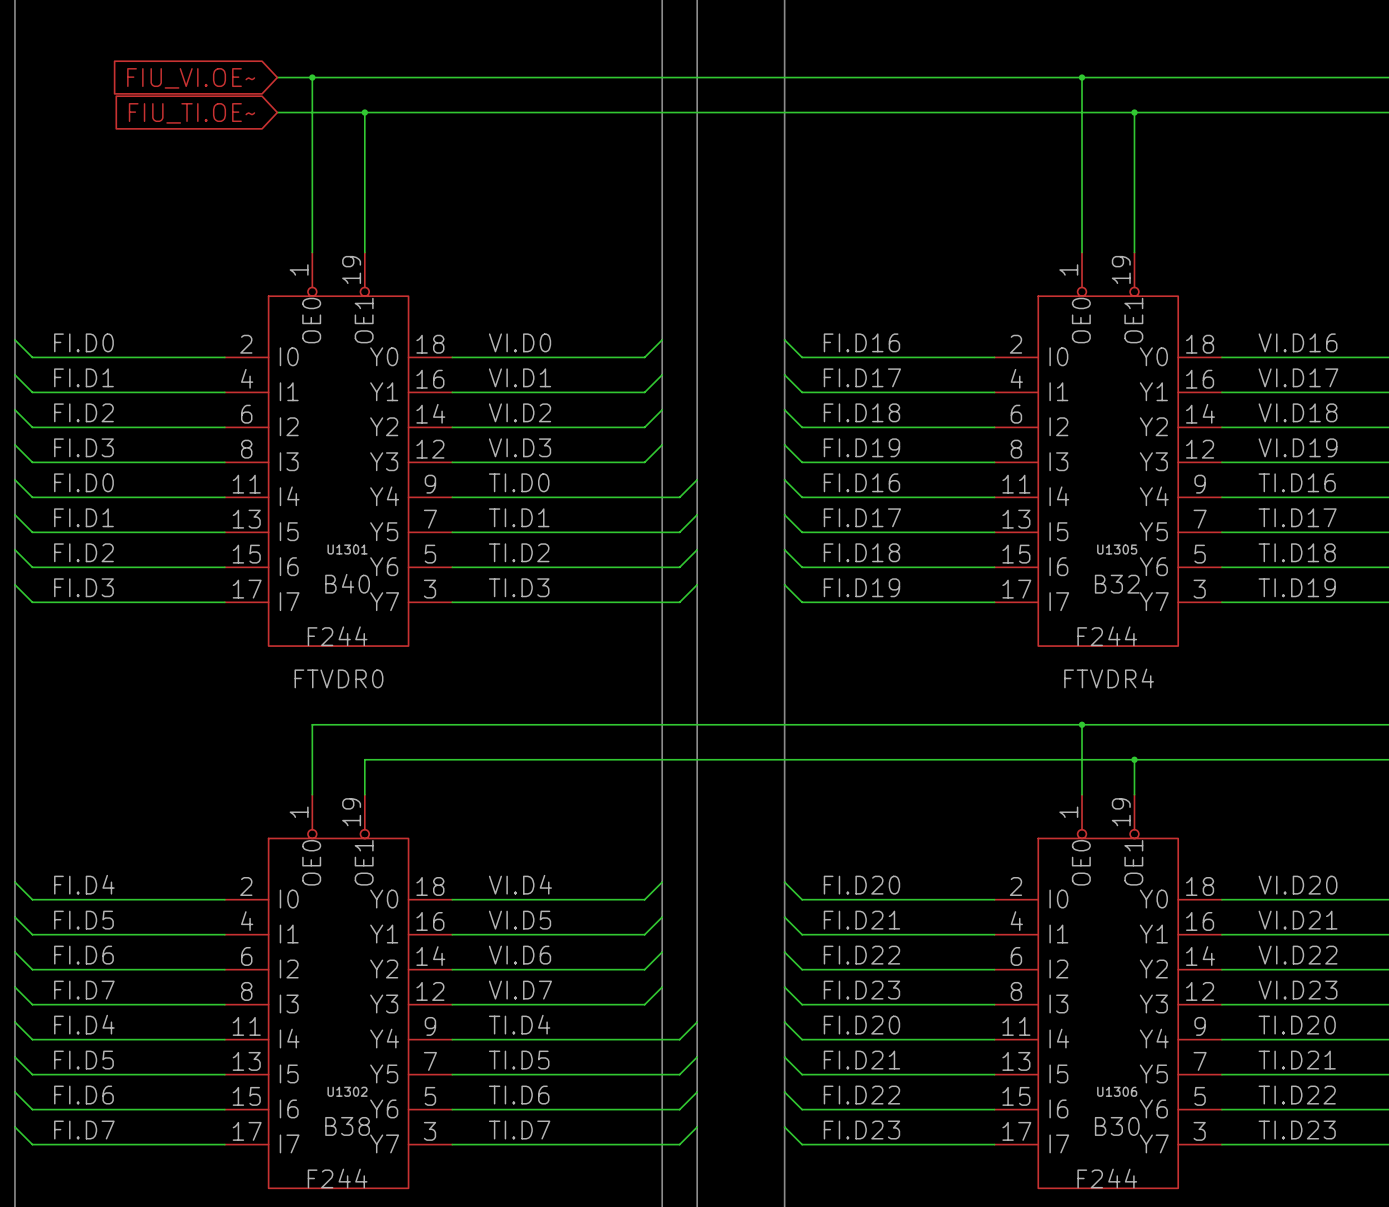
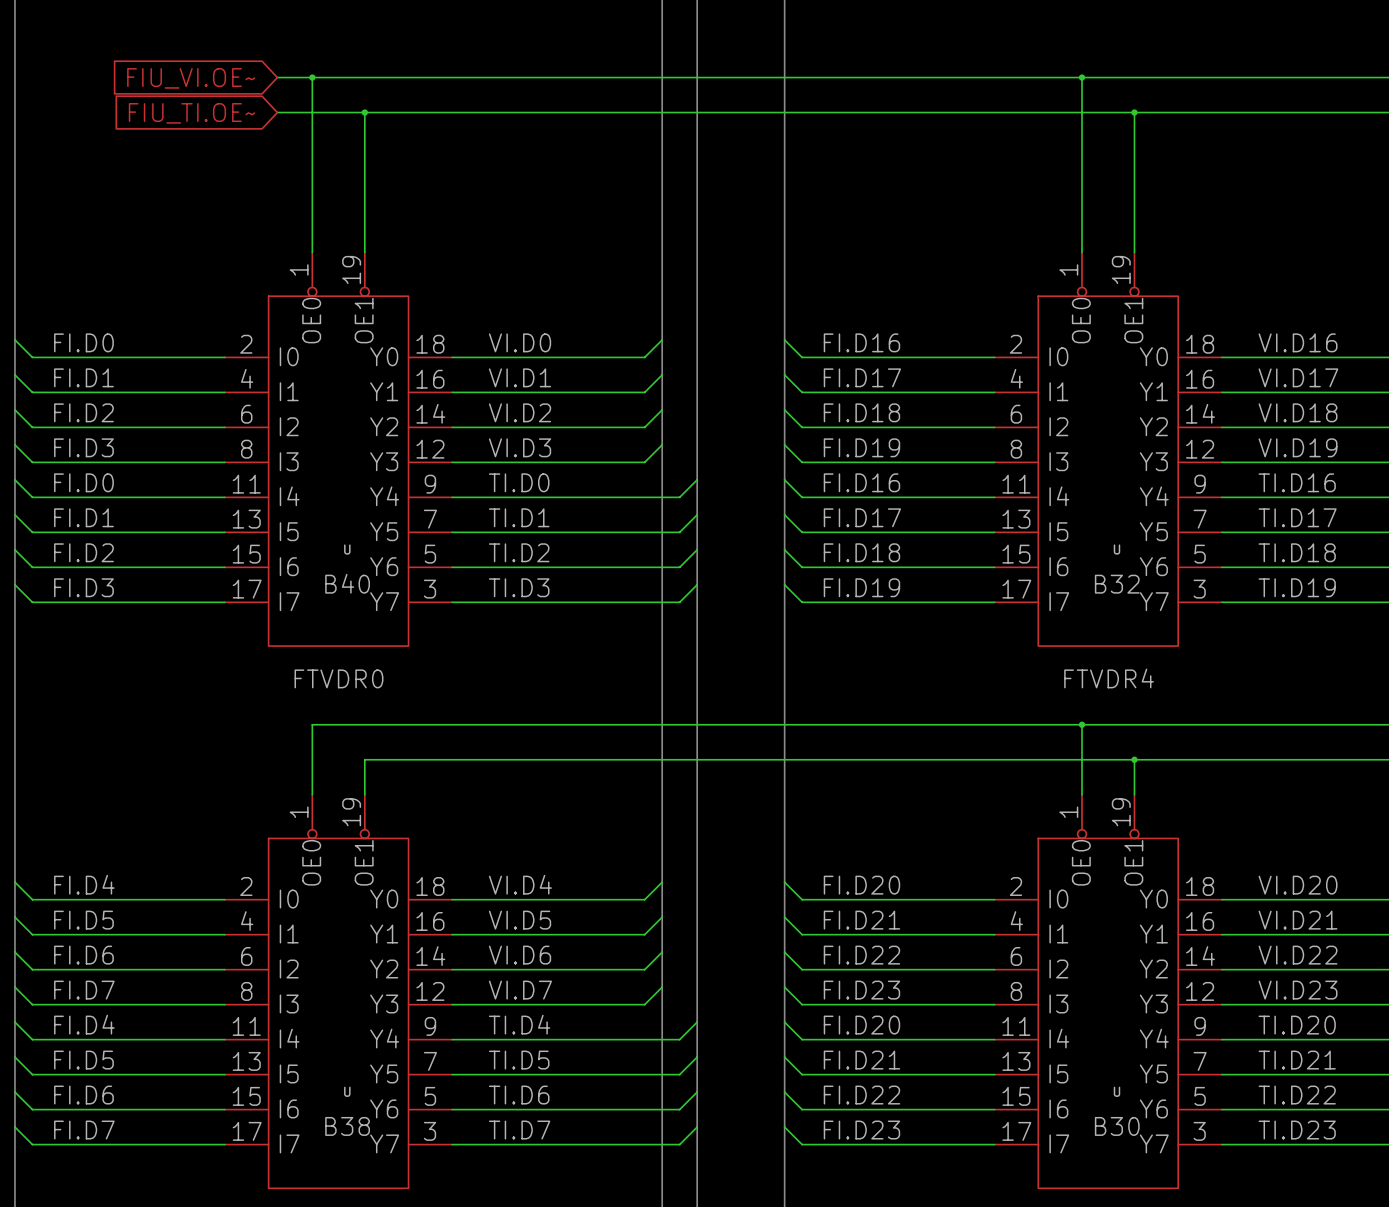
U1301 name: U1301 (347, 549) -> U (347, 549)
U1305 name: U1305 (1117, 549) -> U (1116, 549)
U1301 value: F244 (337, 636) -> none
U1305 value: F244 (1107, 636) -> none
U1302 name: U1302 (347, 1091) -> U (347, 1091)
U1306 name: U1306 (1117, 1091) -> U (1116, 1091)
U1302 value: F244 (337, 1178) -> none
U1306 value: F244 (1107, 1178) -> none

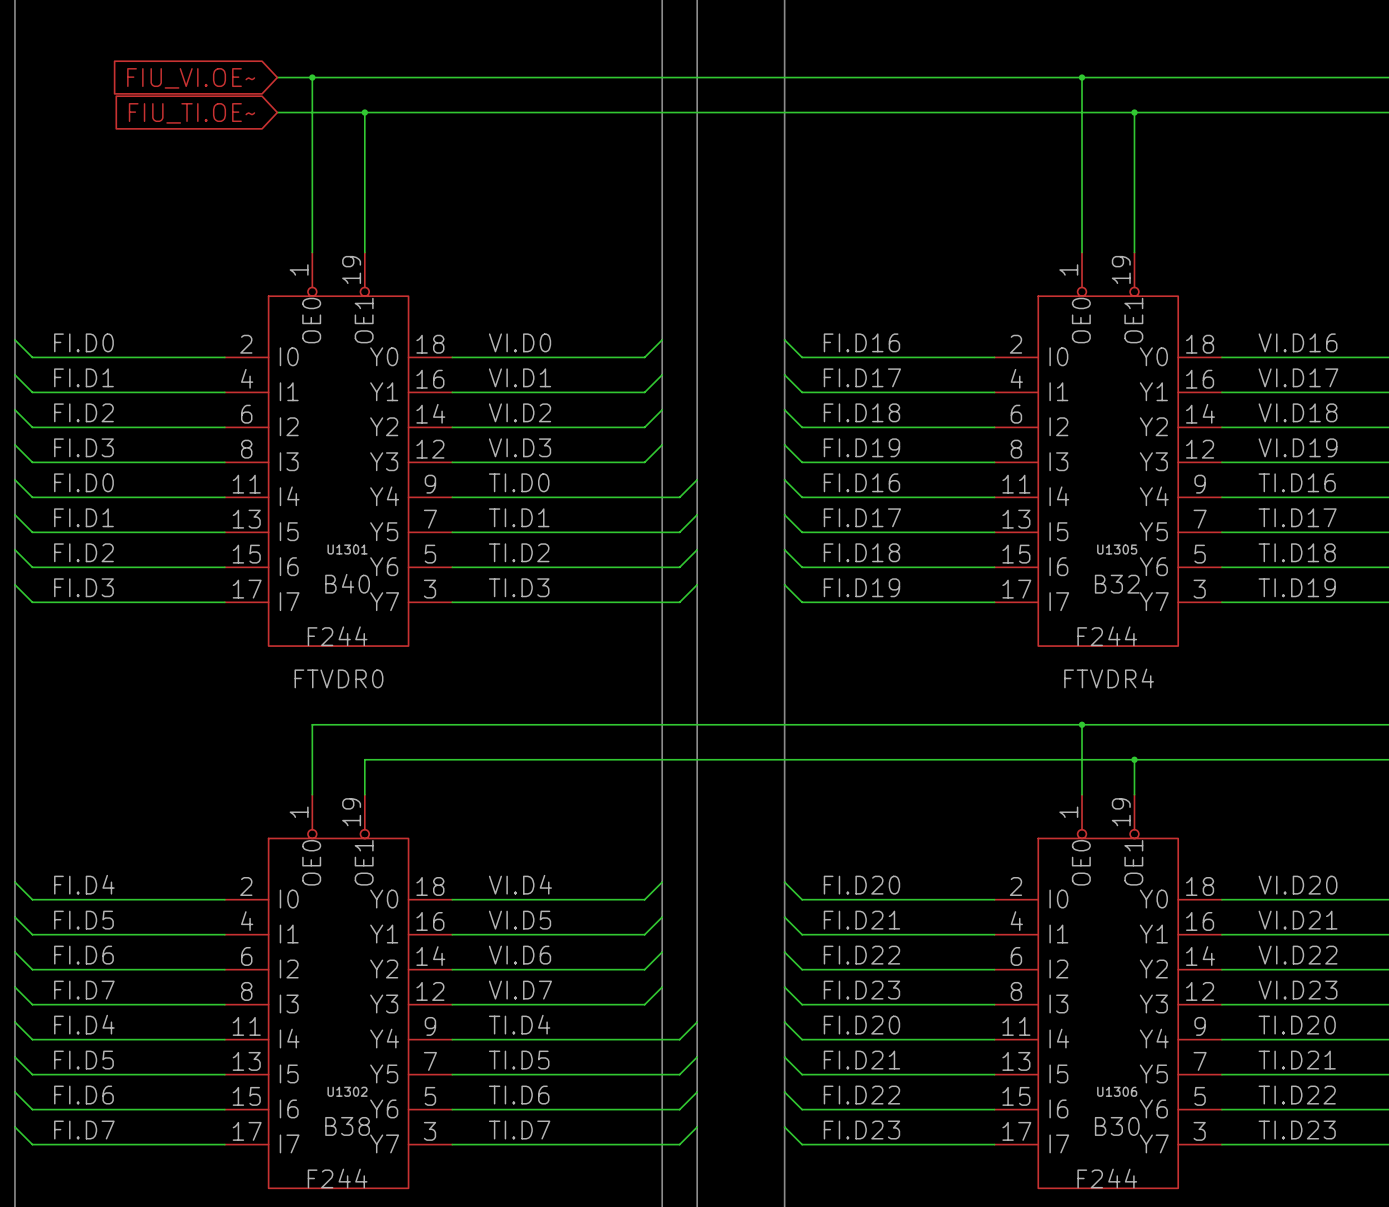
U name: U (347, 549) -> U1301 (347, 549)
U name: U (1116, 549) -> U1305 (1117, 549)
U value: none -> F244 (337, 636)
U value: none -> F244 (1107, 636)
U name: U (347, 1091) -> U1302 (347, 1091)
U name: U (1116, 1091) -> U1306 (1117, 1091)
U value: none -> F244 (337, 1178)
U value: none -> F244 (1107, 1178)

